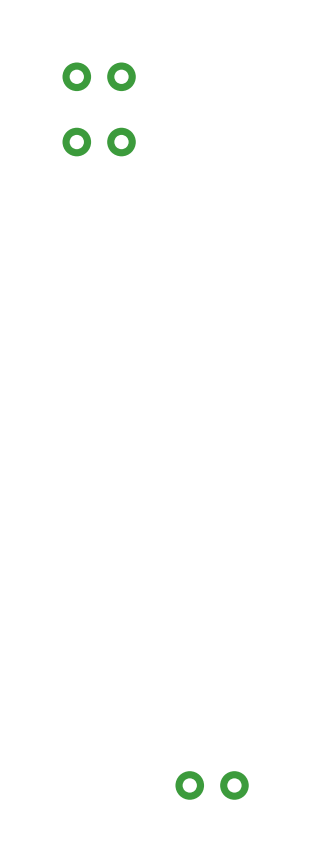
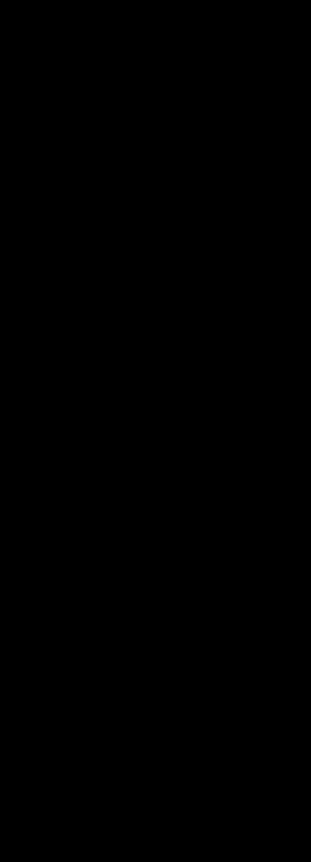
part: (99, 76) -> none
part: (99, 142) -> none
part: (212, 785) -> none

